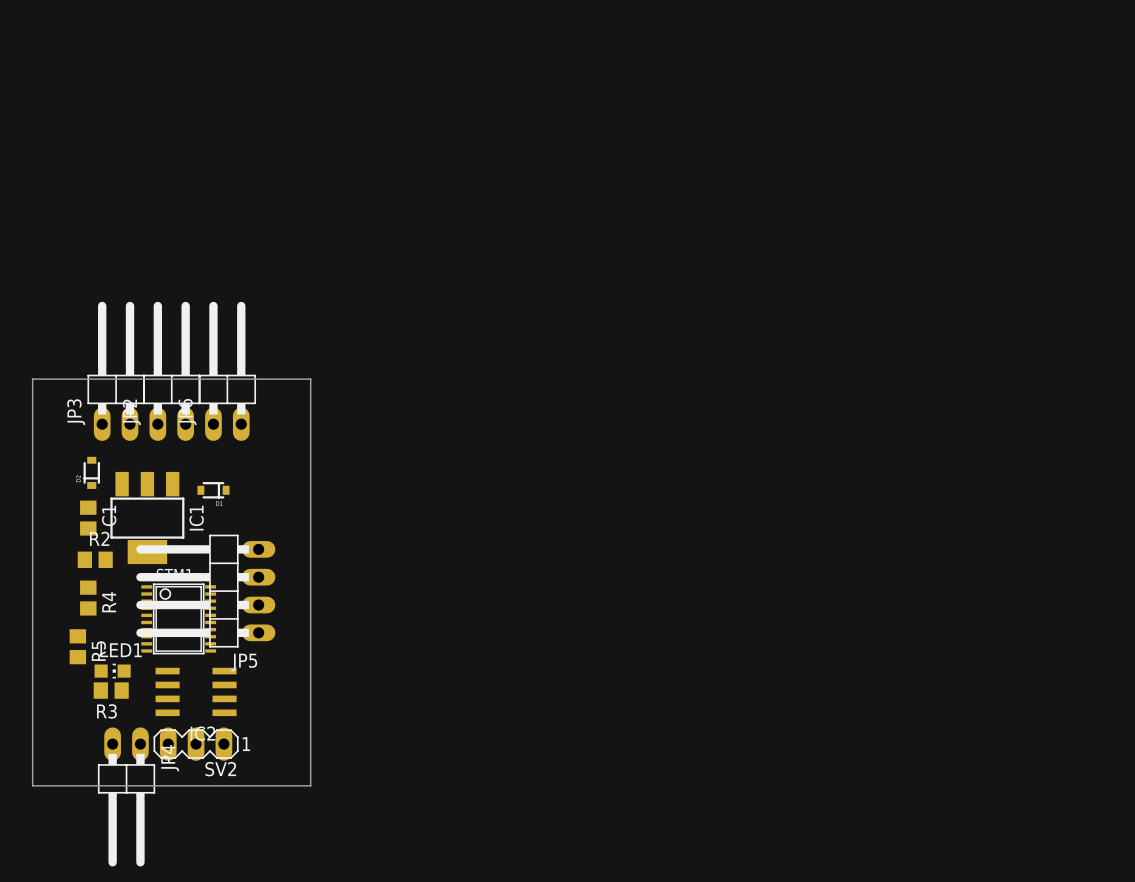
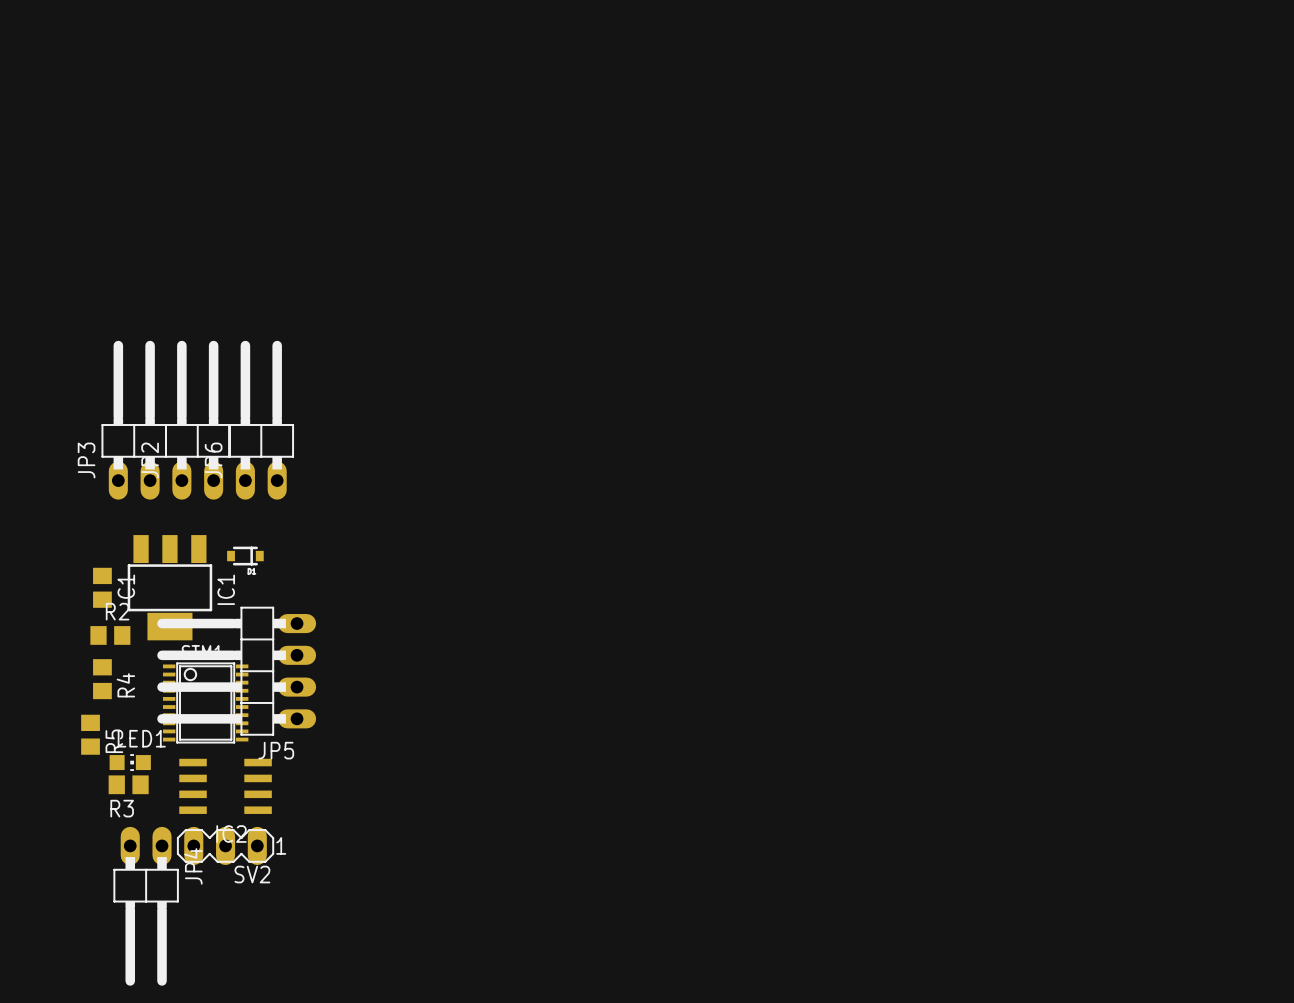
board edge: (32, 379) (310, 379) (310, 785) (32, 785) (32, 379) -> none
part: (91, 472) -> none

